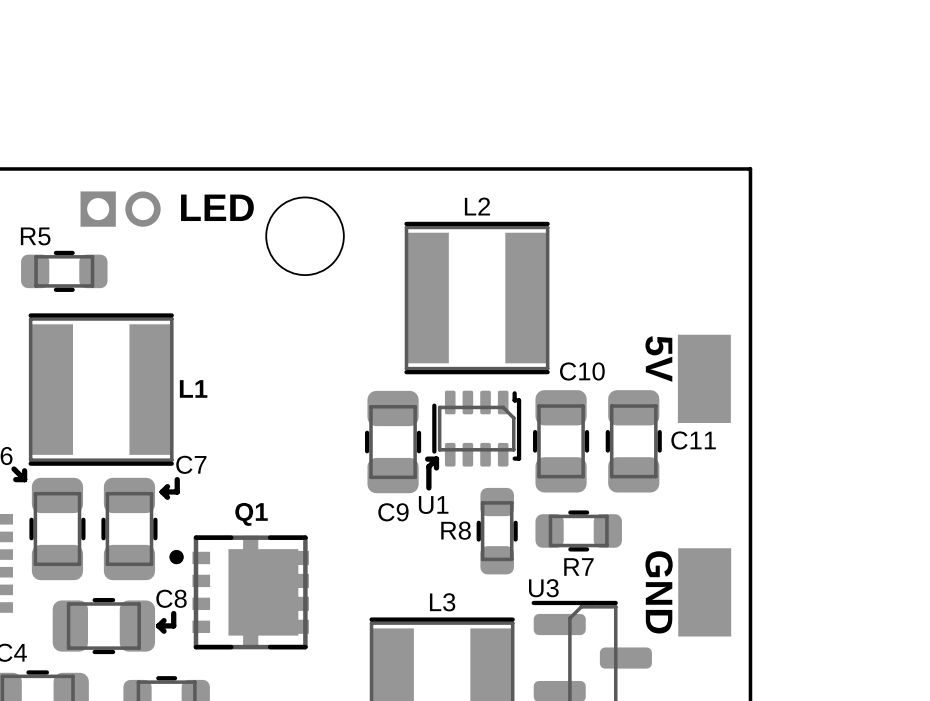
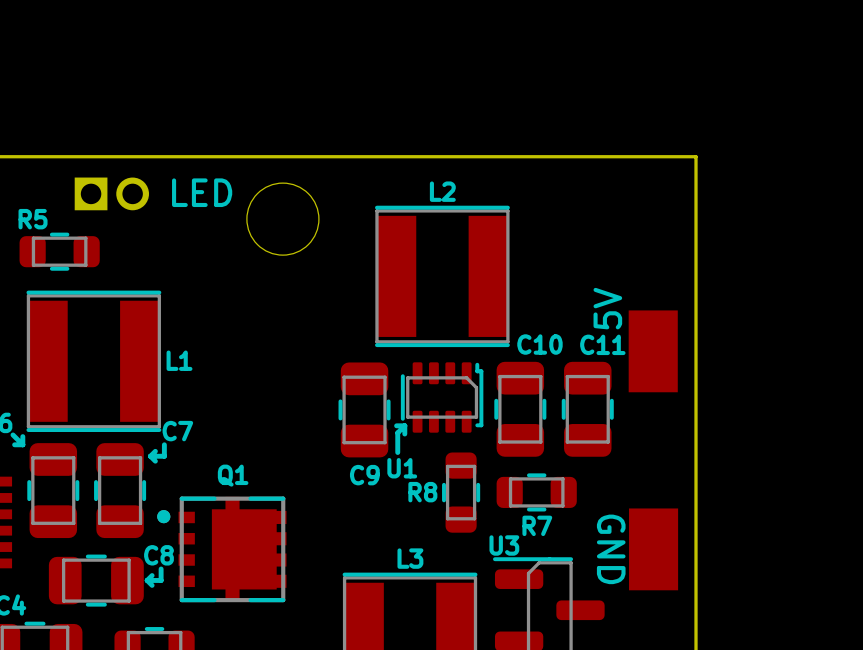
part text rotation: 0° (658, 359) -> 180° (607, 308)
C11 name position: C11 (693, 440) -> C11 (602, 344)

